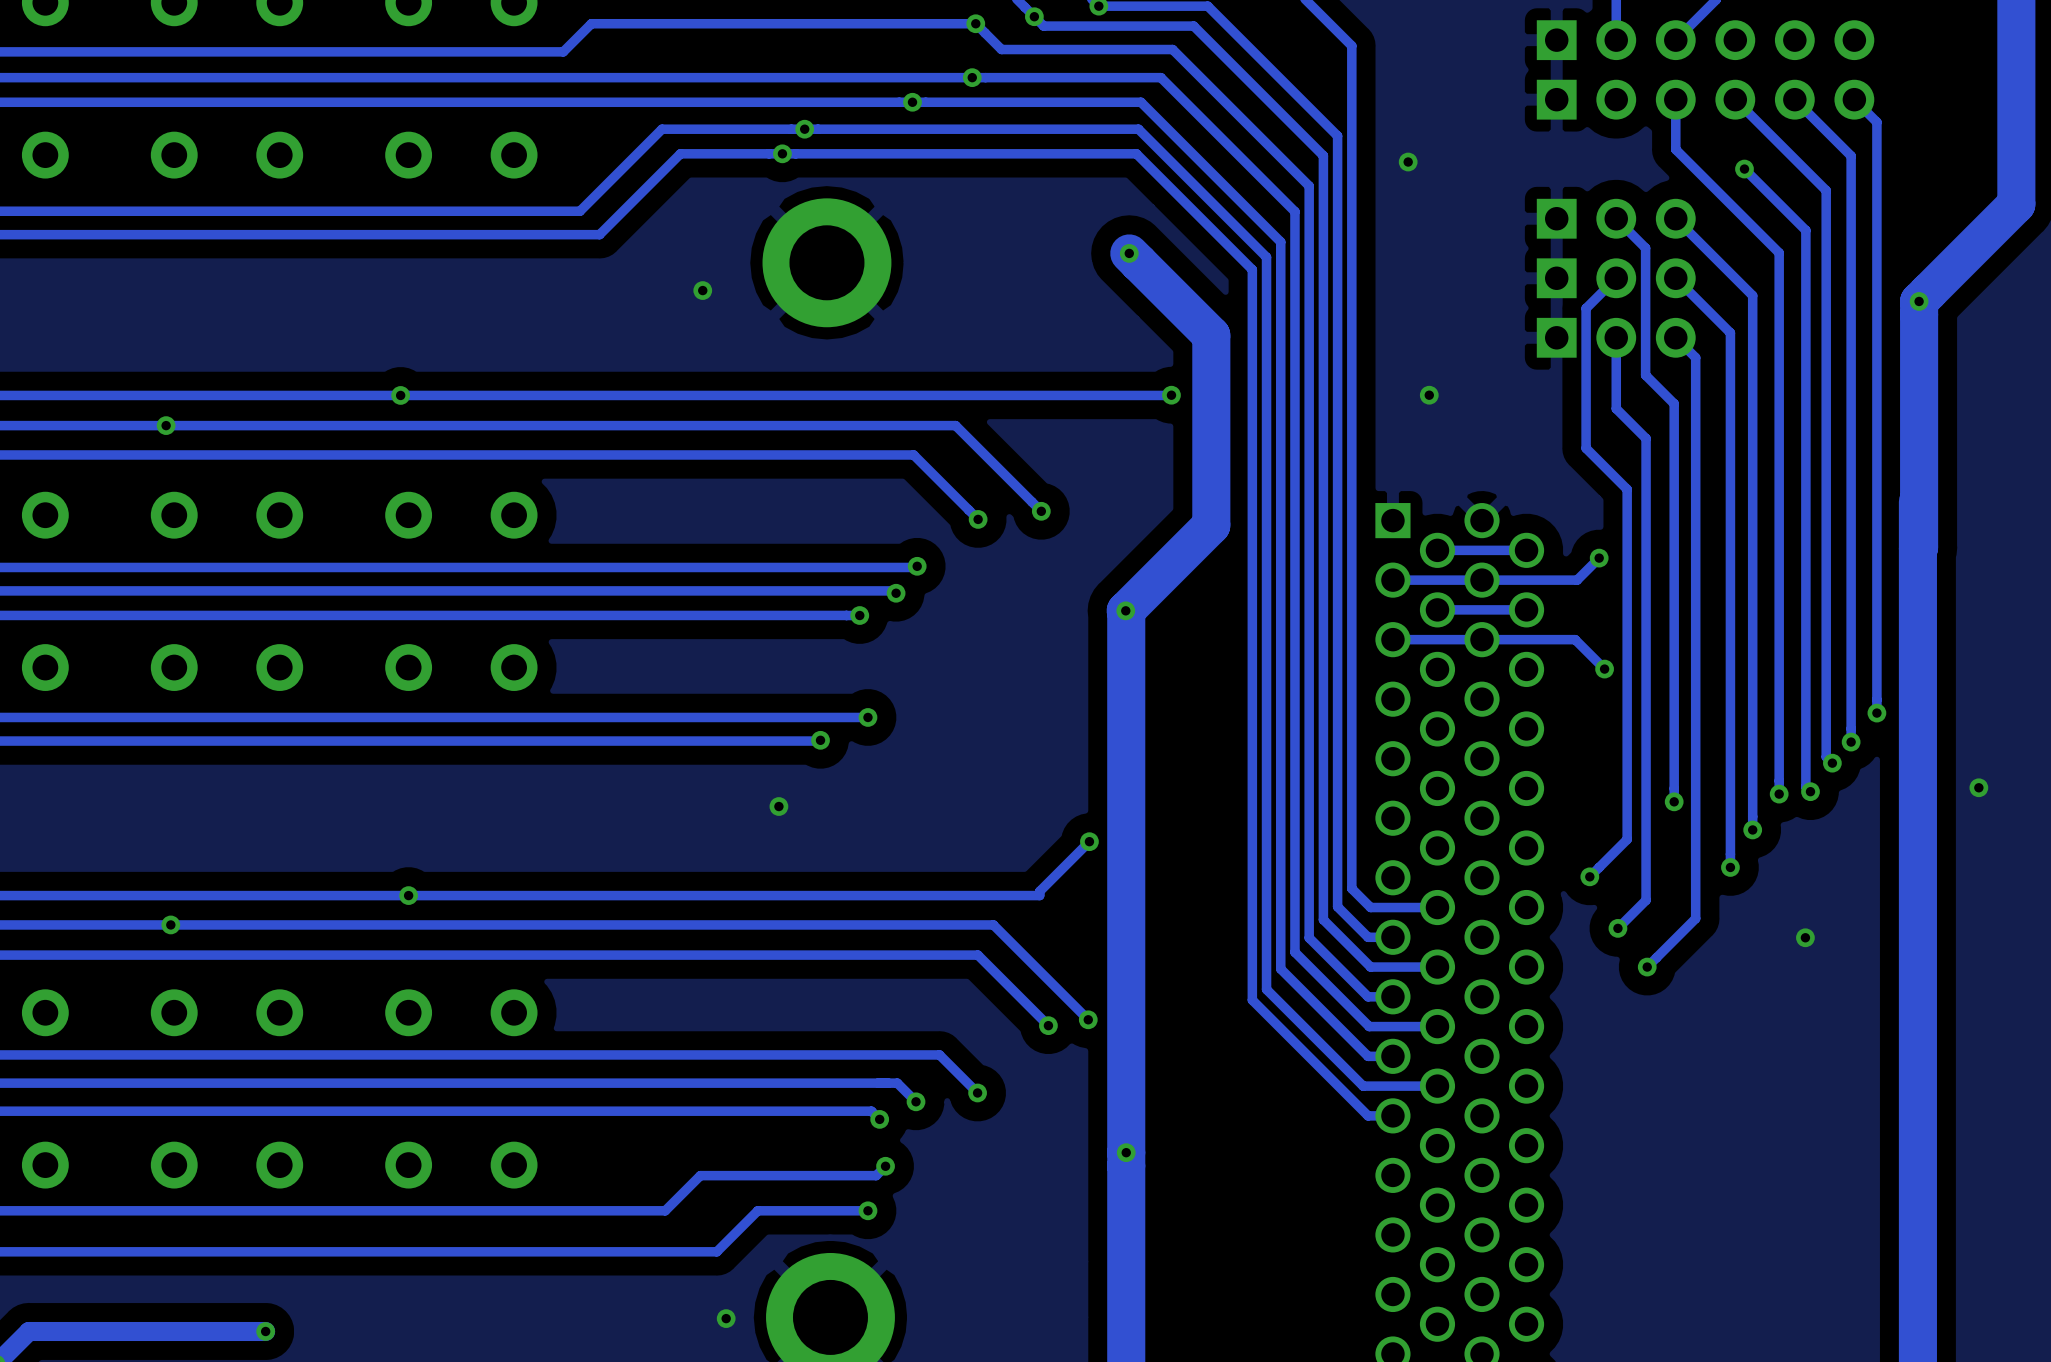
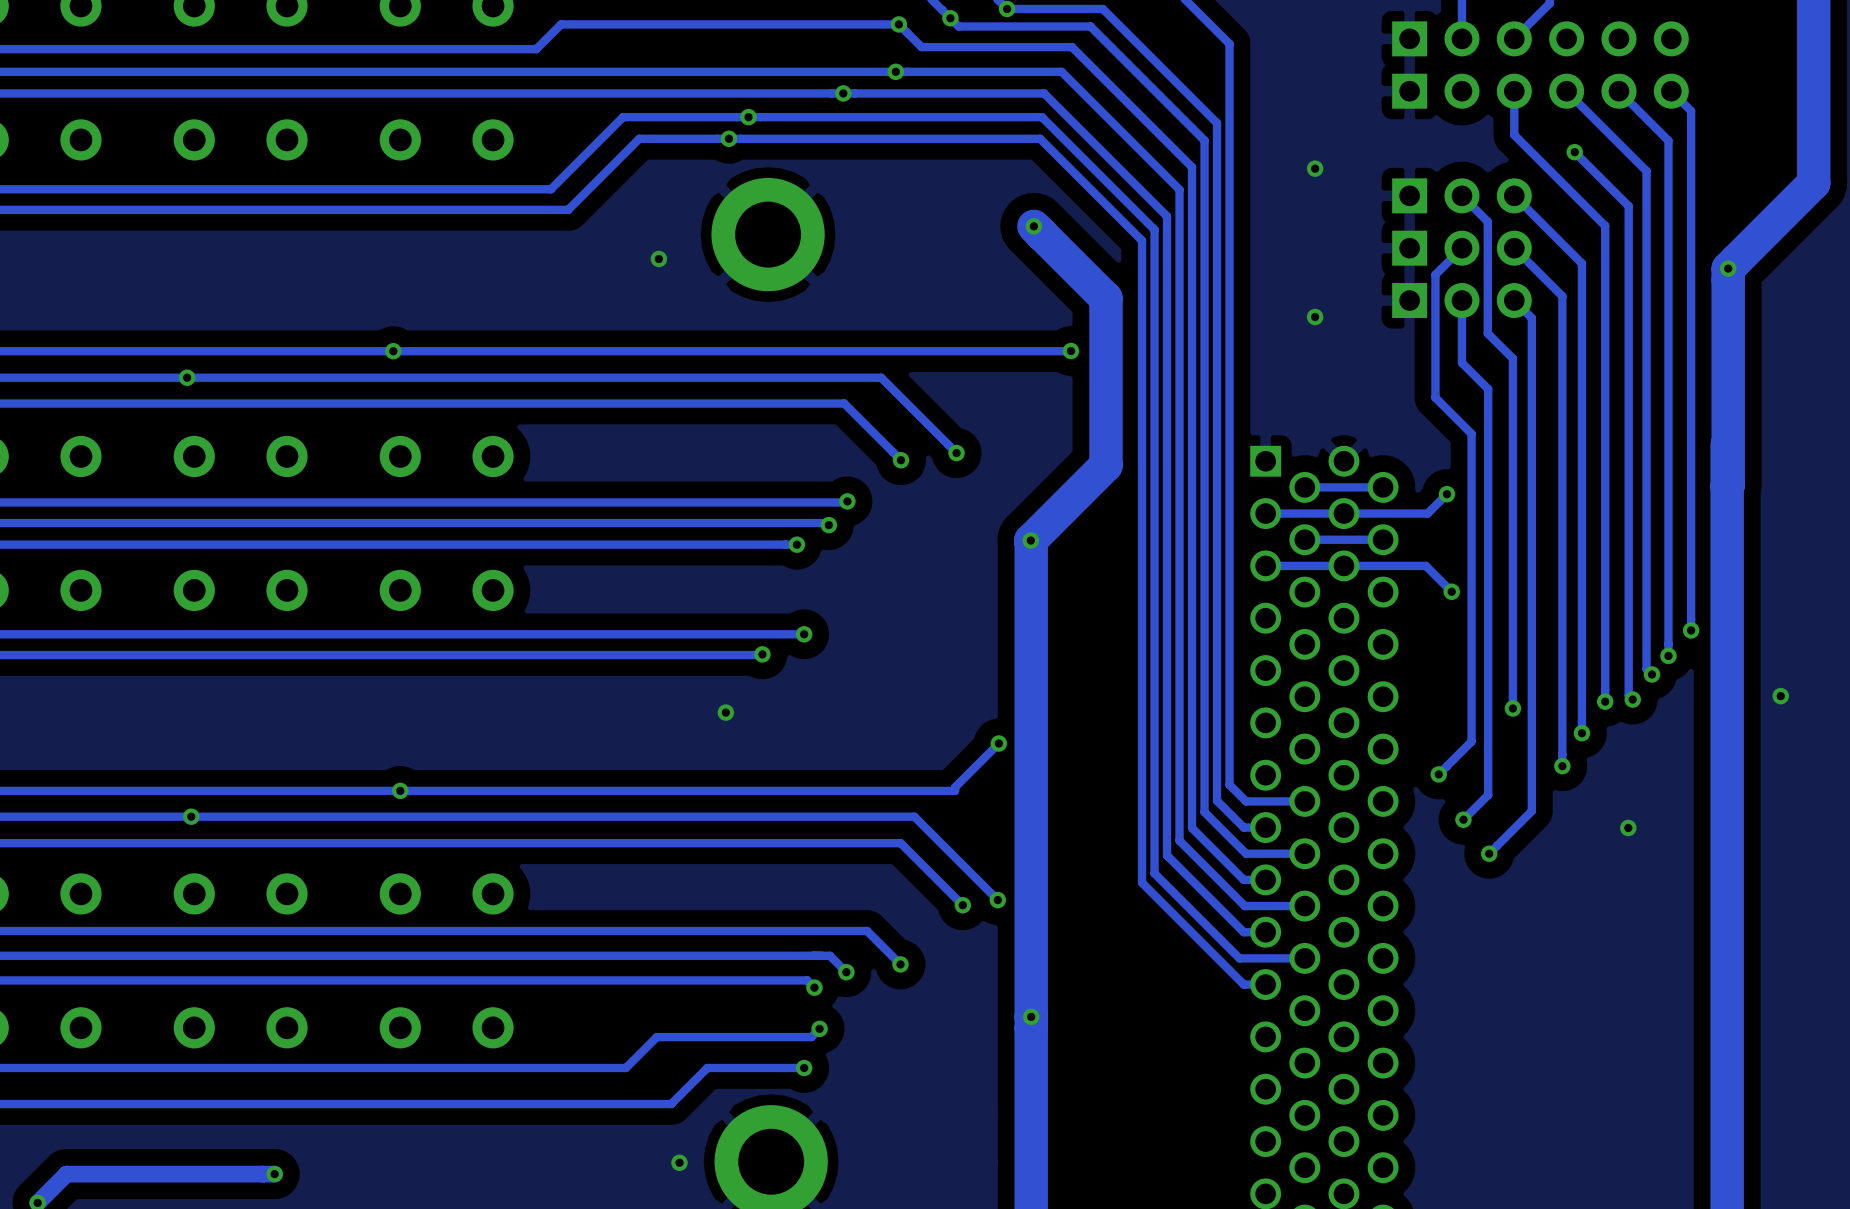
via position: (1408, 162) -> (1315, 168)
via position: (1429, 395) -> (1315, 317)

